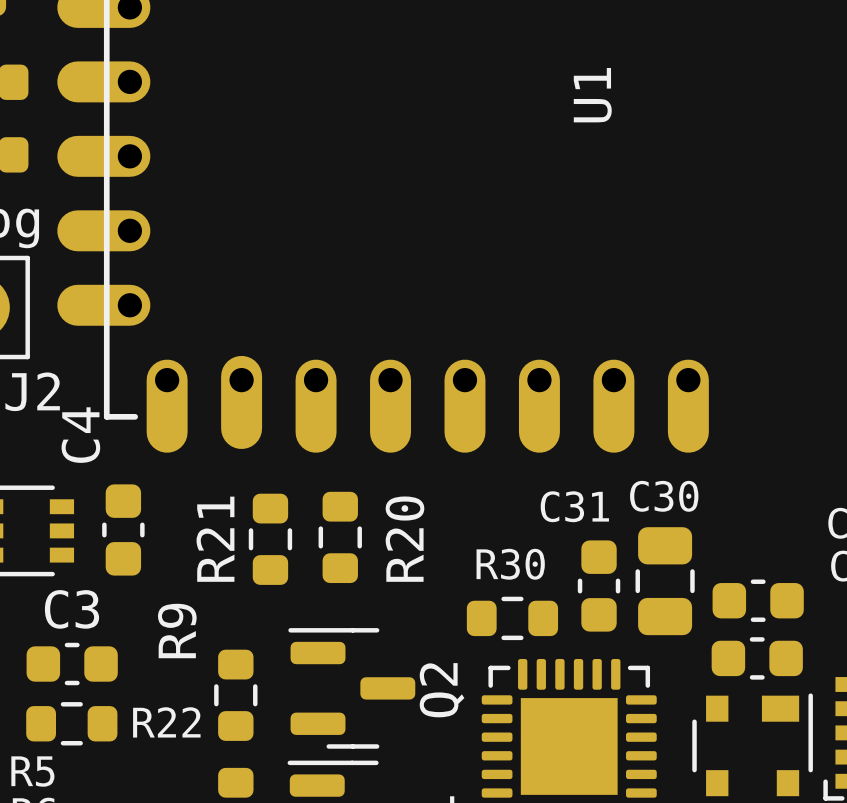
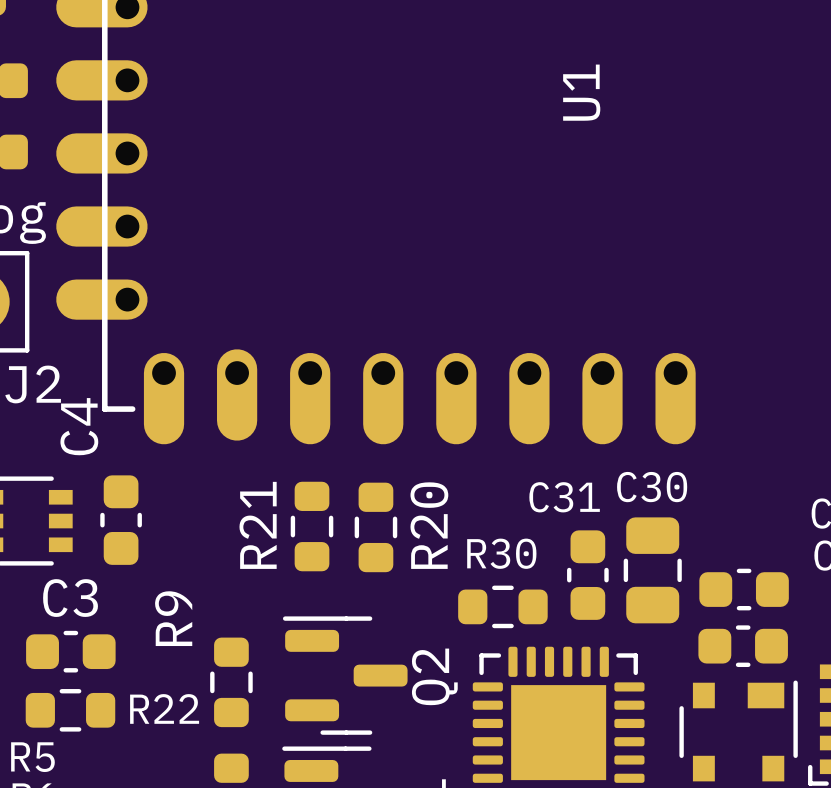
R20 position: (340, 537) -> (375, 527)
R21 position: (270, 539) -> (312, 526)
R20 name position: R20 (404, 539) -> R20 (429, 525)

